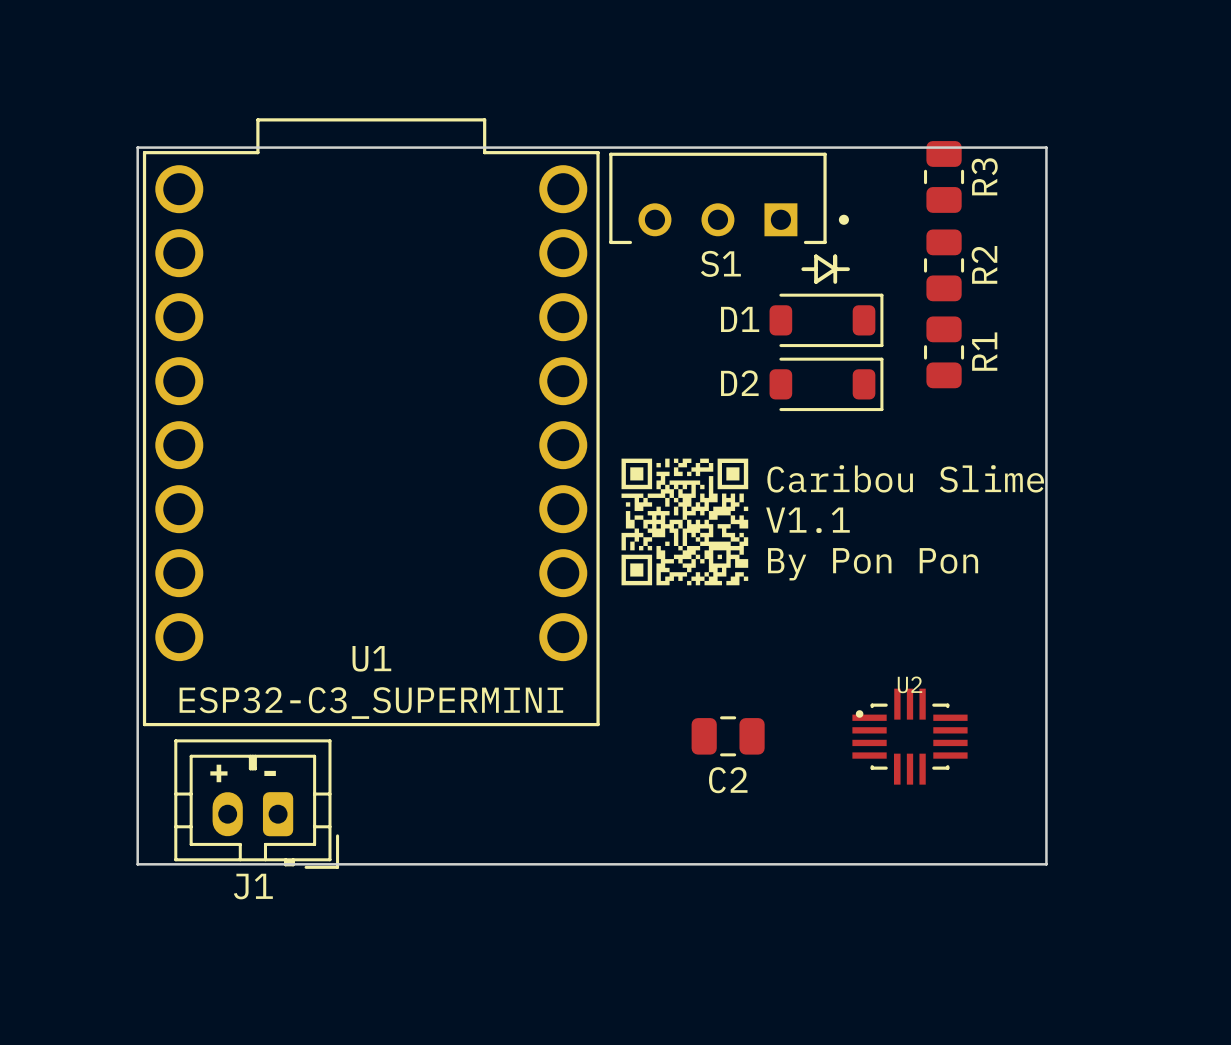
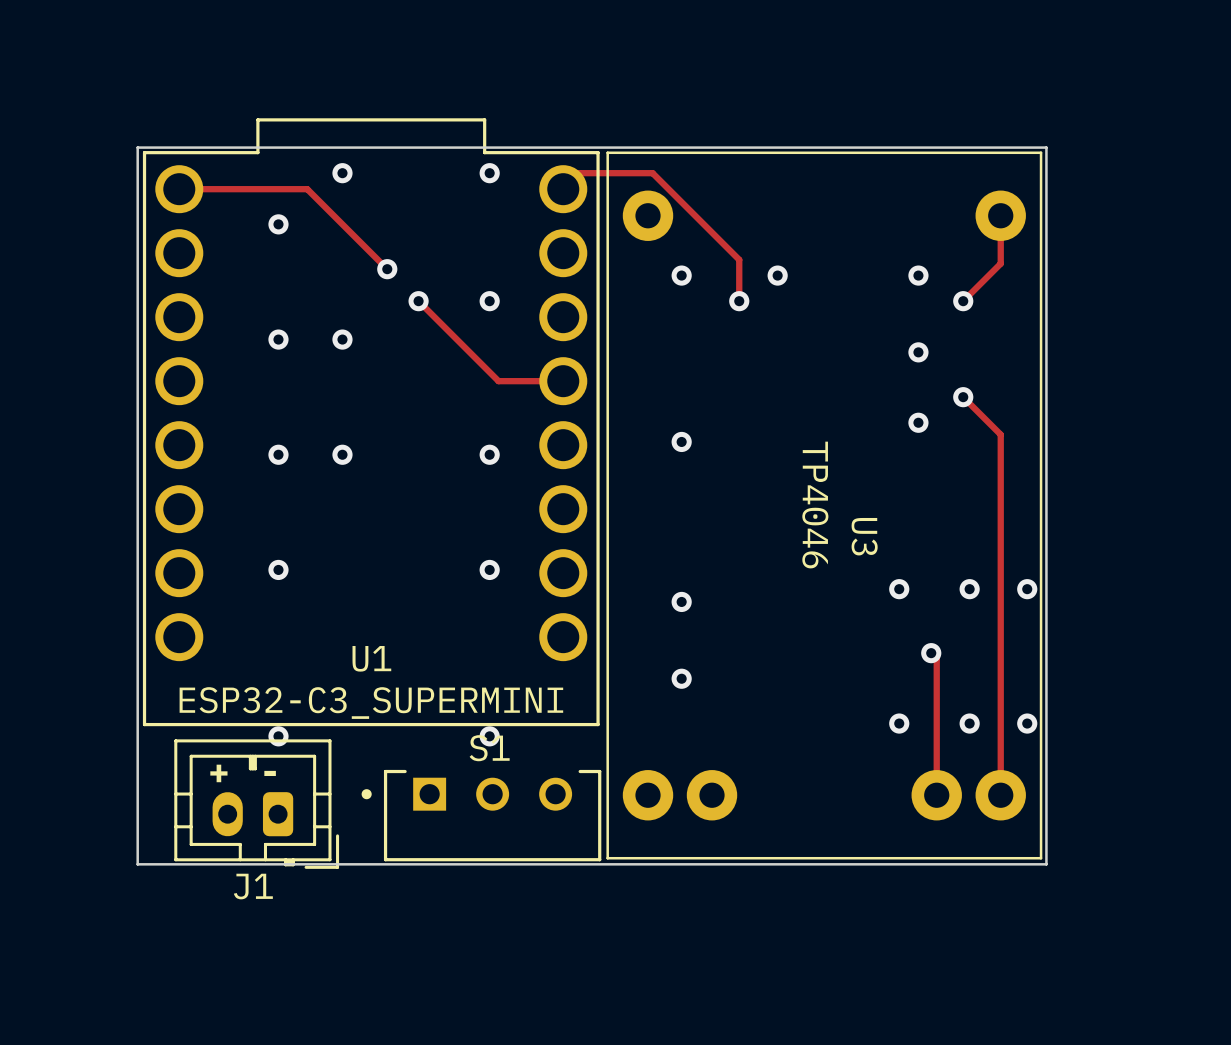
via: none -> (342, 173)
via: none -> (489, 173)
R3: (944, 176) -> none
track: none -> (179, 189) (307, 189) (387, 269)
track: none -> (563, 189) (579, 173) (652, 173) (739, 259) (739, 301)
S1 rotation: 0° (729, 198) -> 180° (481, 815)
S1 position: (729, 198) -> (481, 815)
track: none -> (1000, 215) (1000, 263) (963, 301)
via: none -> (278, 224)
line: (835, 256) (835, 281) -> none
R2: (944, 265) -> none
via: none -> (387, 269)
line: (803, 269) (816, 269) -> none
line: (835, 269) (816, 256) (816, 281) (835, 269) -> none
line: (835, 269) (848, 269) -> none
via: none -> (681, 275)
via: none -> (777, 275)
via: none -> (918, 275)
track: none -> (418, 301) (498, 381) (563, 381)
via: none -> (418, 301)
via: none -> (489, 301)
via: none -> (739, 301)
via: none -> (963, 301)
D1: (826, 320) -> none
via: none -> (278, 339)
via: none -> (342, 339)
via: none -> (918, 352)
R1: (944, 352) -> none
D2: (826, 384) -> none
track: none -> (963, 397) (1000, 434) (1000, 795)
via: none -> (963, 397)
via: none -> (918, 422)
via: none -> (681, 441)
via: none -> (278, 454)
via: none -> (342, 454)
via: none -> (489, 454)
drawing: [621, 458, 749, 586] -> none
text: Caribou Slime (905, 478) -> none
U3: none -> (824, 505)
text: V1.1 (807, 520) -> none
text: By Pon Pon (873, 564) -> none
via: none -> (278, 569)
via: none -> (489, 569)
via: none -> (899, 589)
via: none -> (969, 589)
via: none -> (1027, 589)
via: none -> (681, 601)
track: none -> (931, 653) (936, 658) (936, 795)
via: none -> (931, 653)
via: none -> (681, 678)
via: none -> (899, 723)
via: none -> (969, 723)
via: none -> (1027, 723)
via: none -> (278, 736)
via: none -> (489, 736)
C2: (728, 736) -> none
U2: (909, 736) -> none

